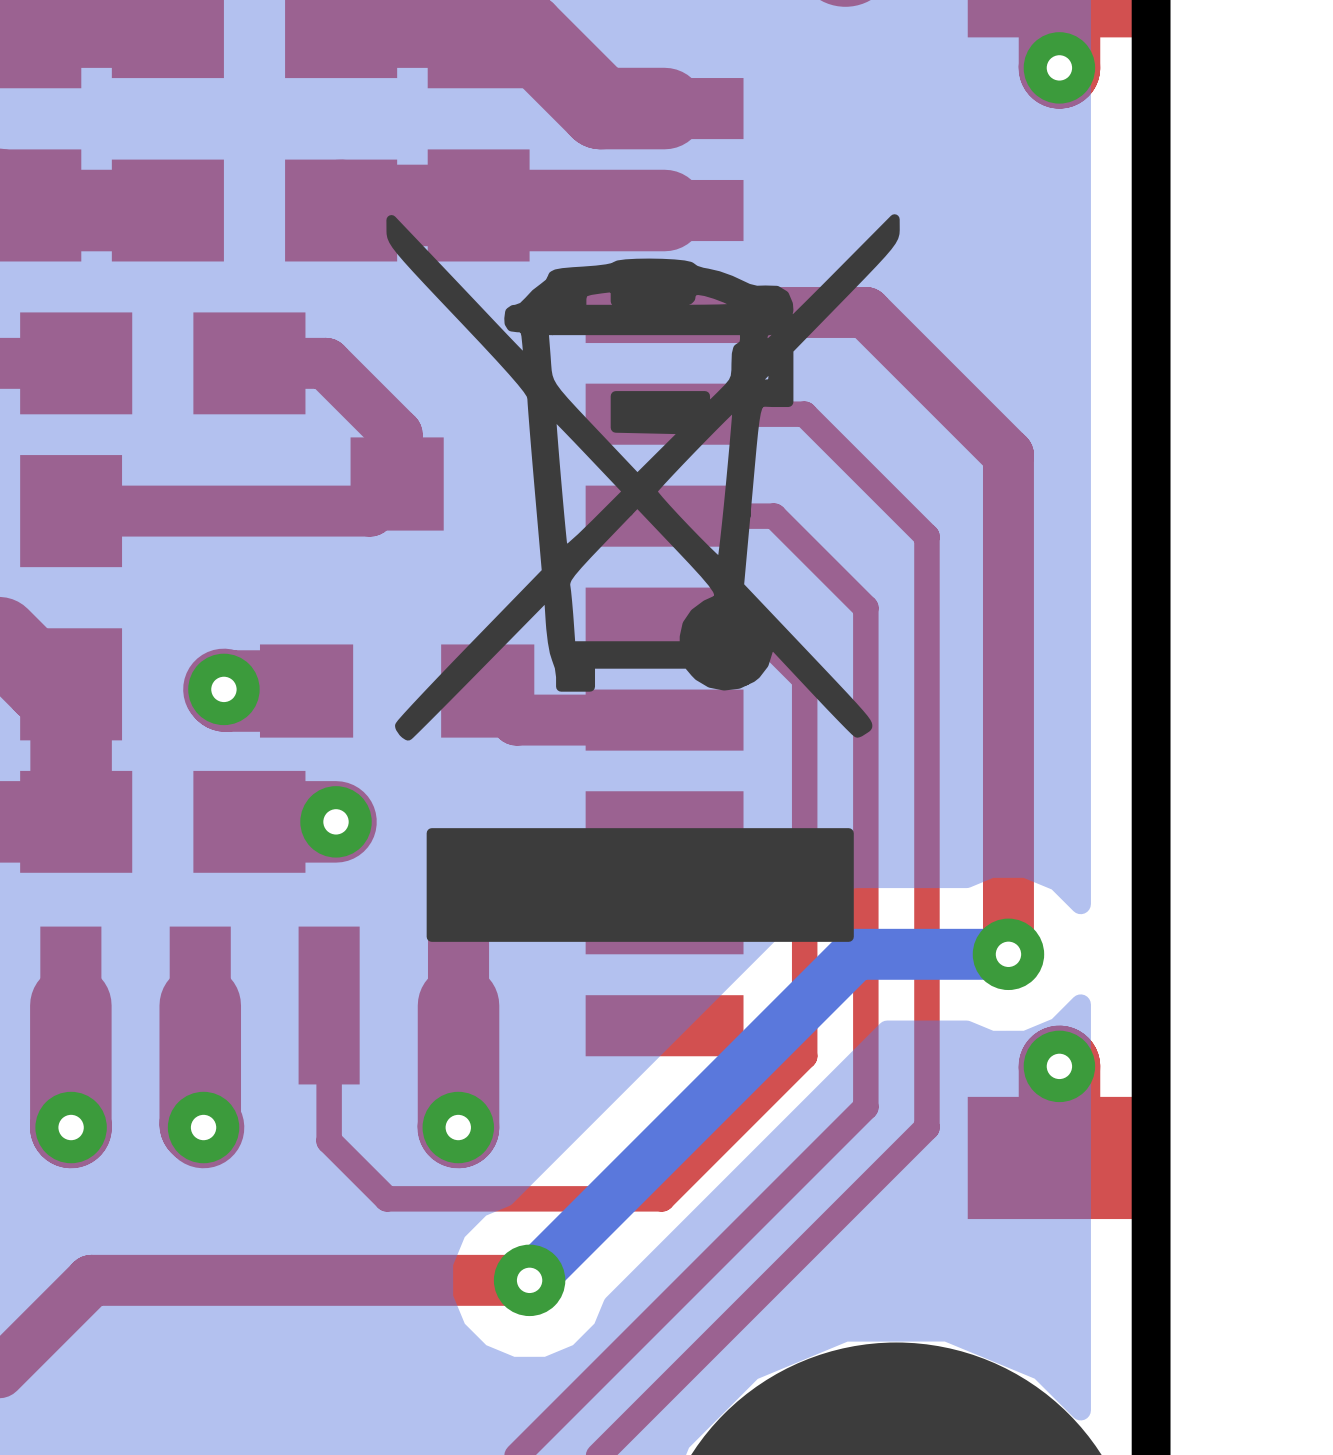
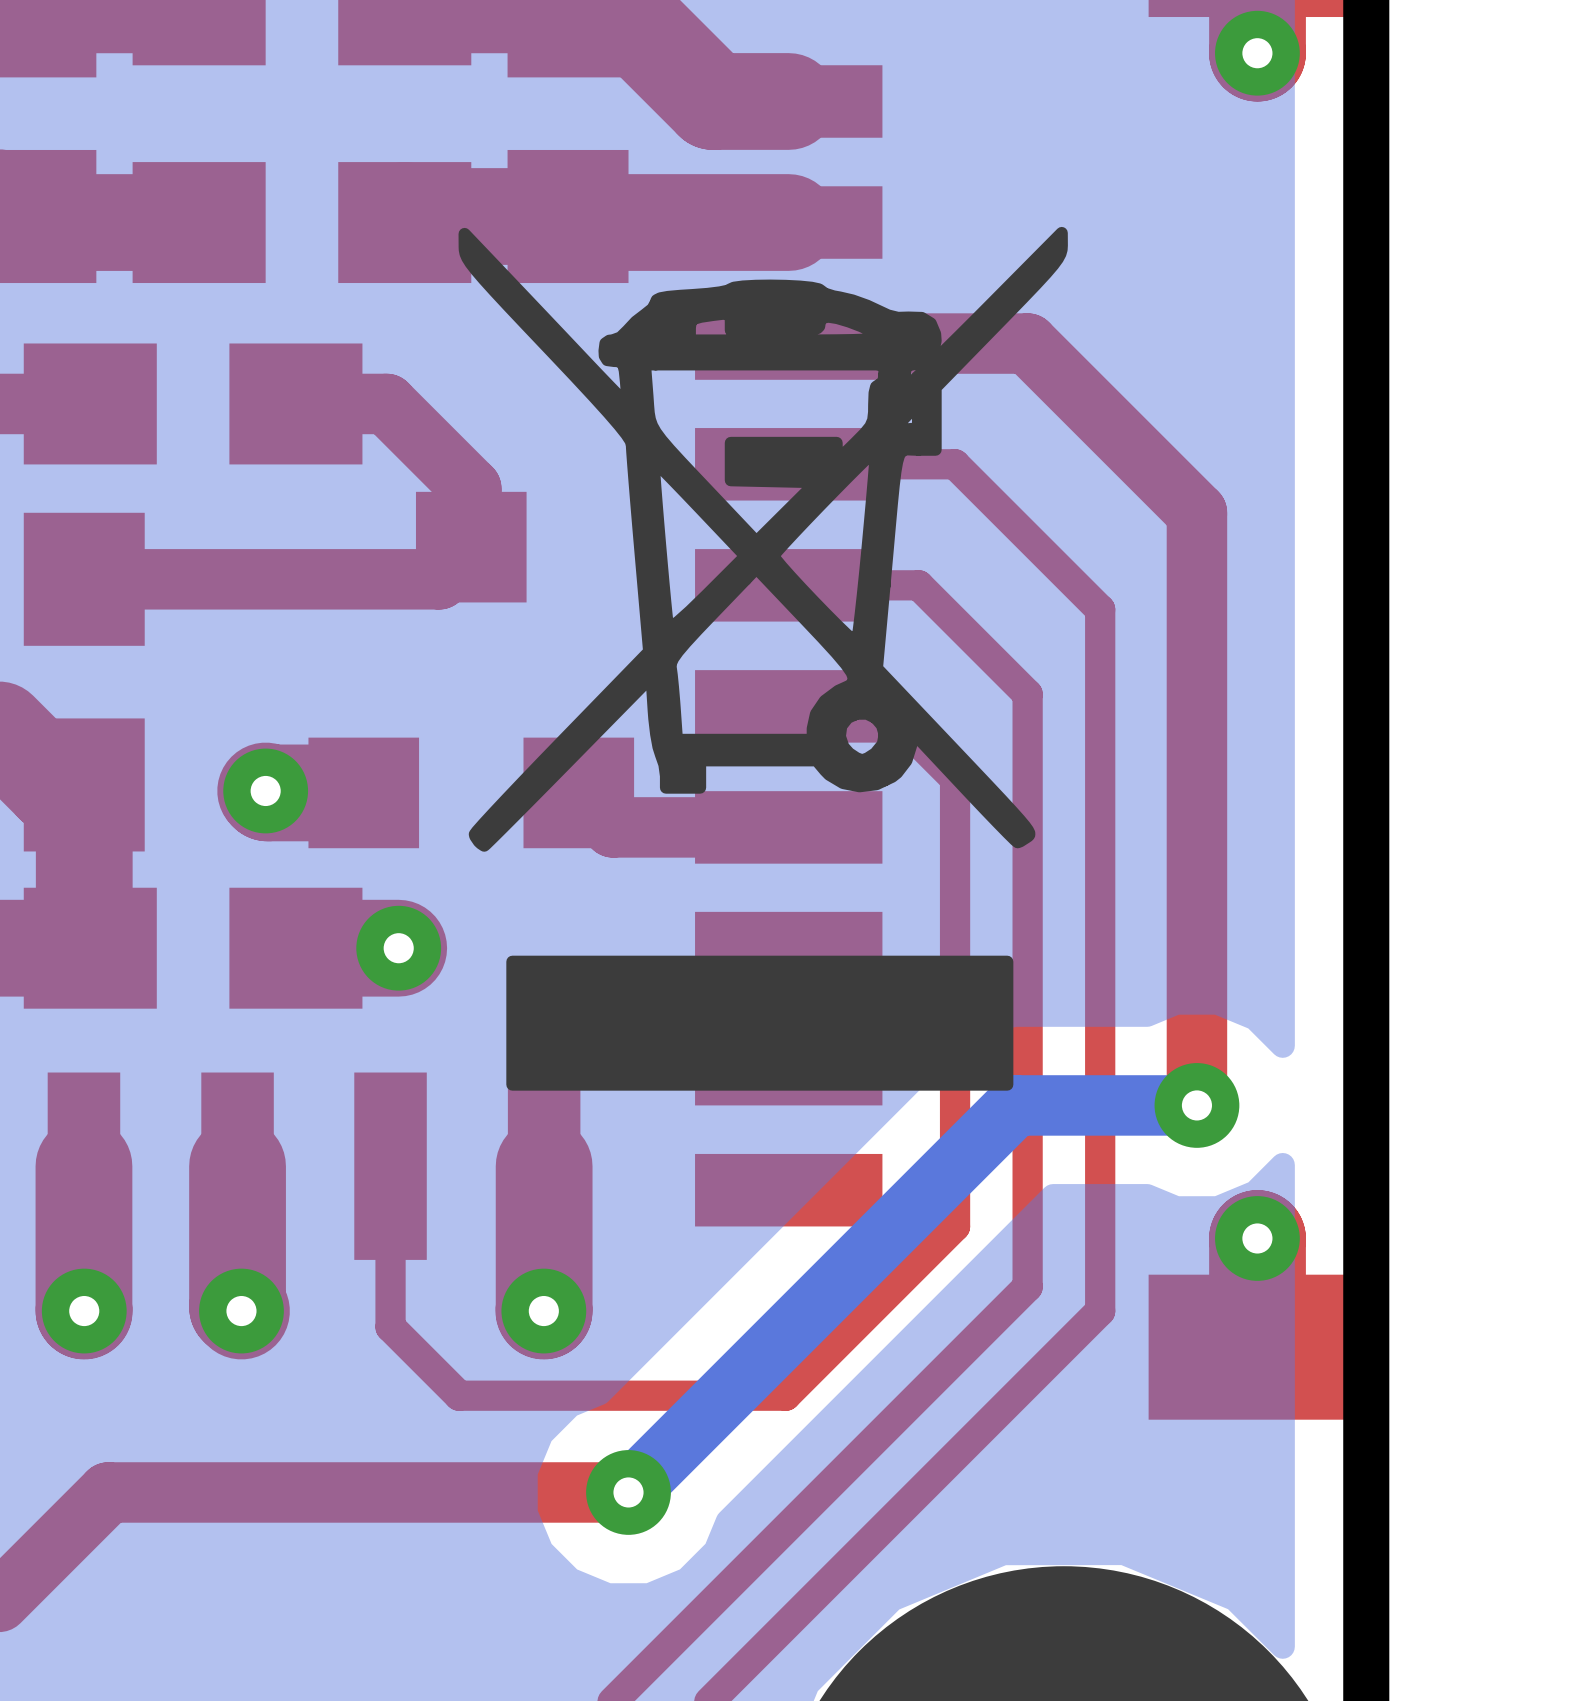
drawing shape: [386, 214, 900, 942] -> [458, 226, 1068, 1091]

